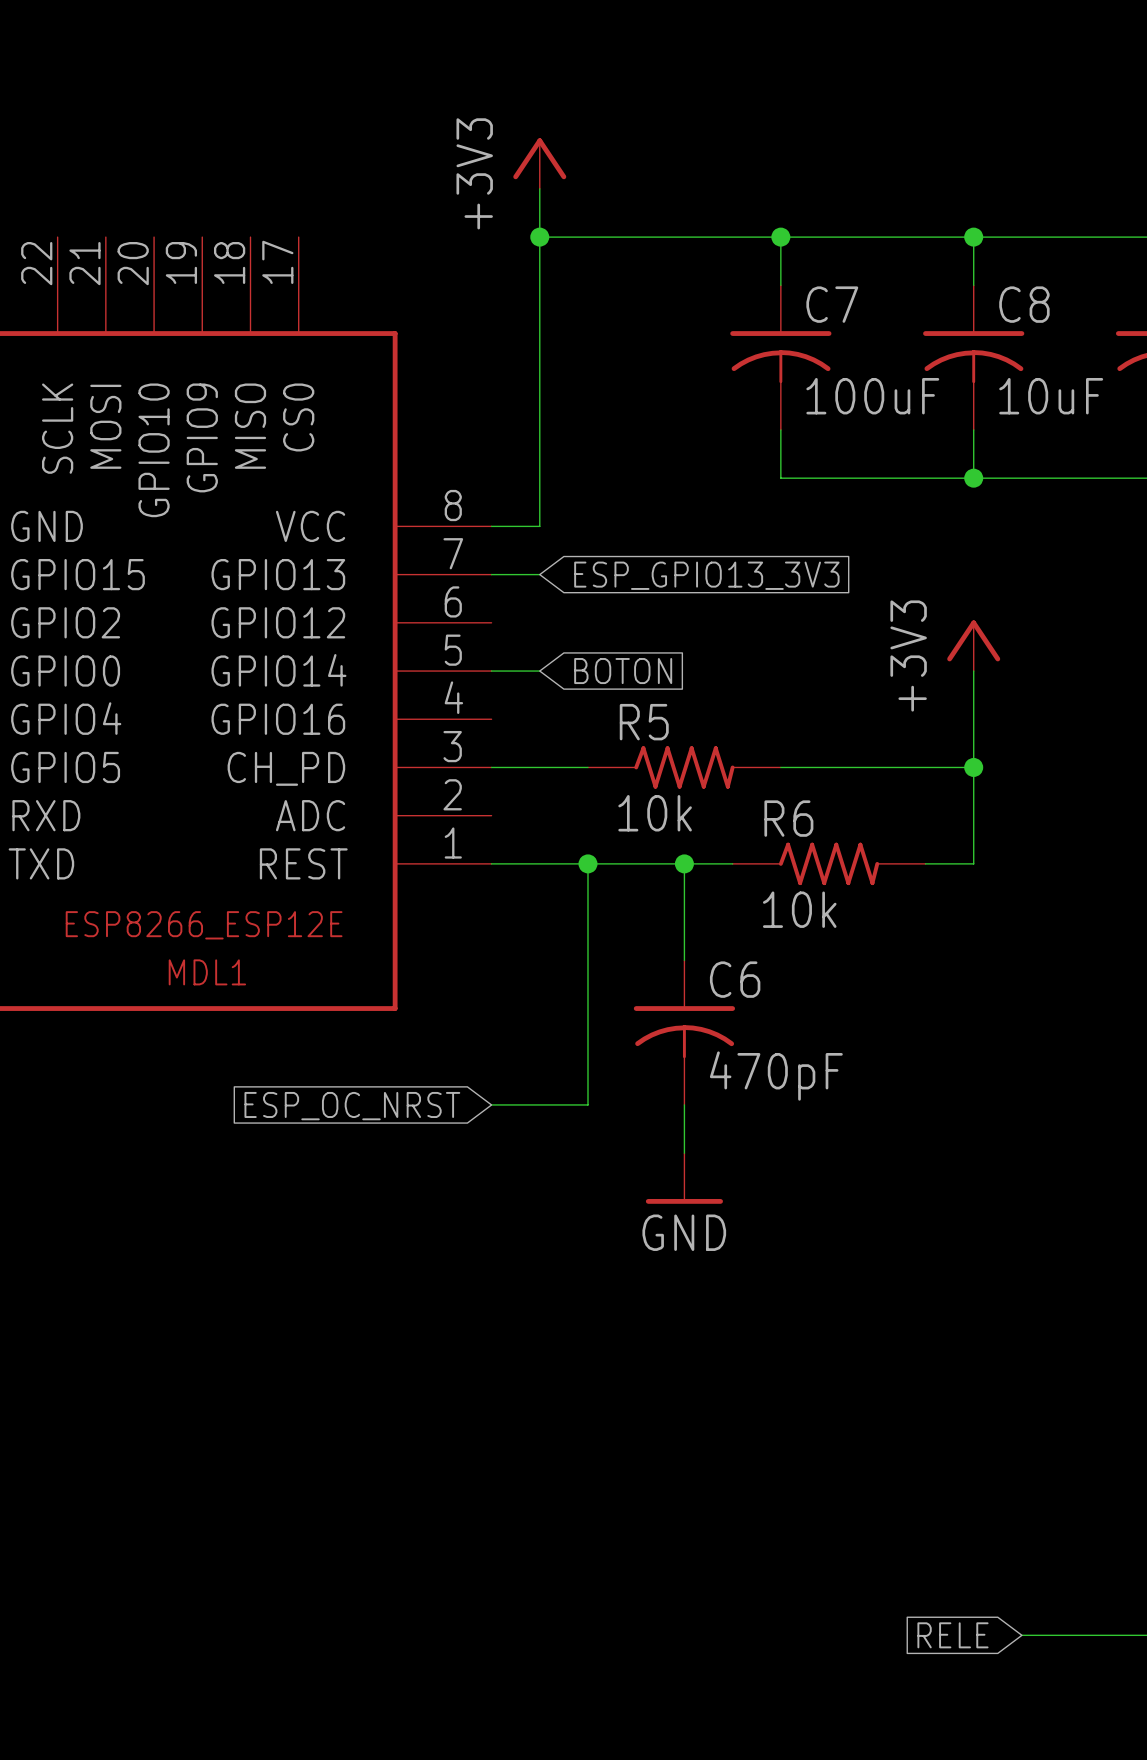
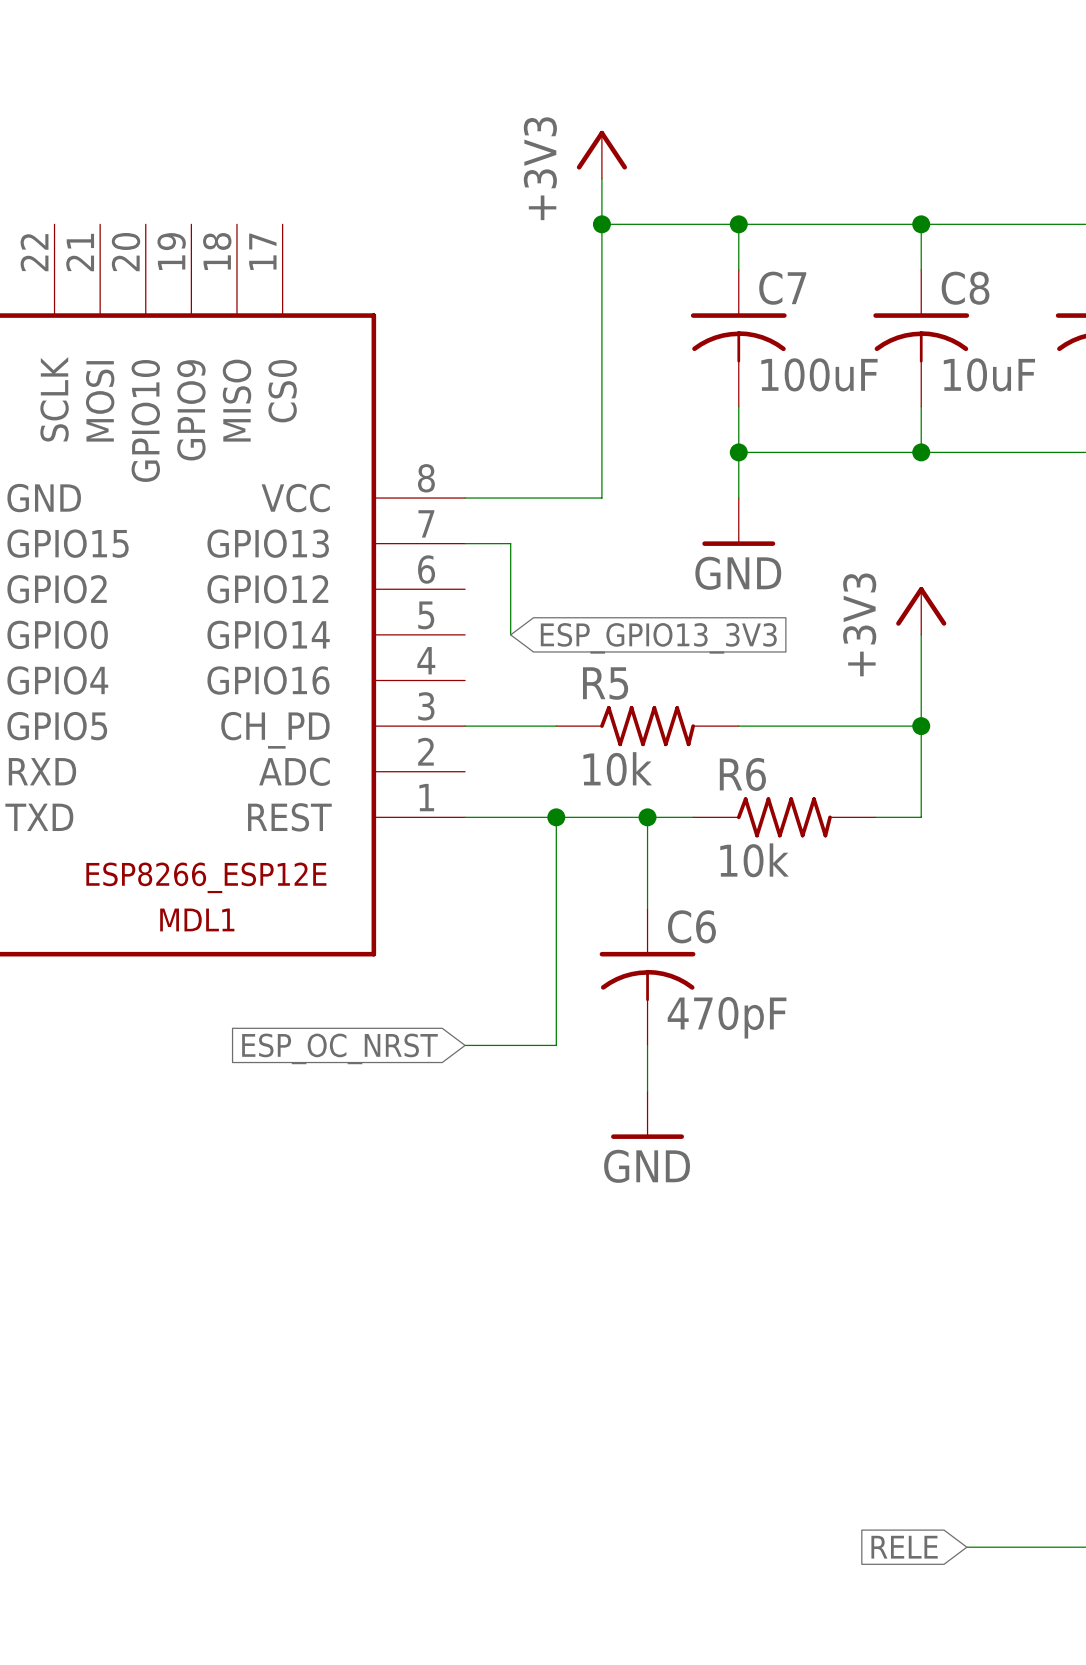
power symbol position: +3V3 (539, 163) -> +3V3 (601, 154)
wire: (539, 188) (539, 526) -> (601, 178) (601, 498) (510, 498)
wire: (539, 237) (636, 237) -> none
junction position: (539, 237) -> (601, 224)
wire: none -> (738, 452) (738, 498)
junction: none -> (738, 452)
power symbol: none -> GND (738, 521)
global label: ESP_GPIO13_3V3 (706, 575) -> none
wire: (491, 671) (539, 671) -> (510, 543) (510, 634)
global label: BOTON (623, 671) -> ESP_GPIO13_3V3 (658, 638)

